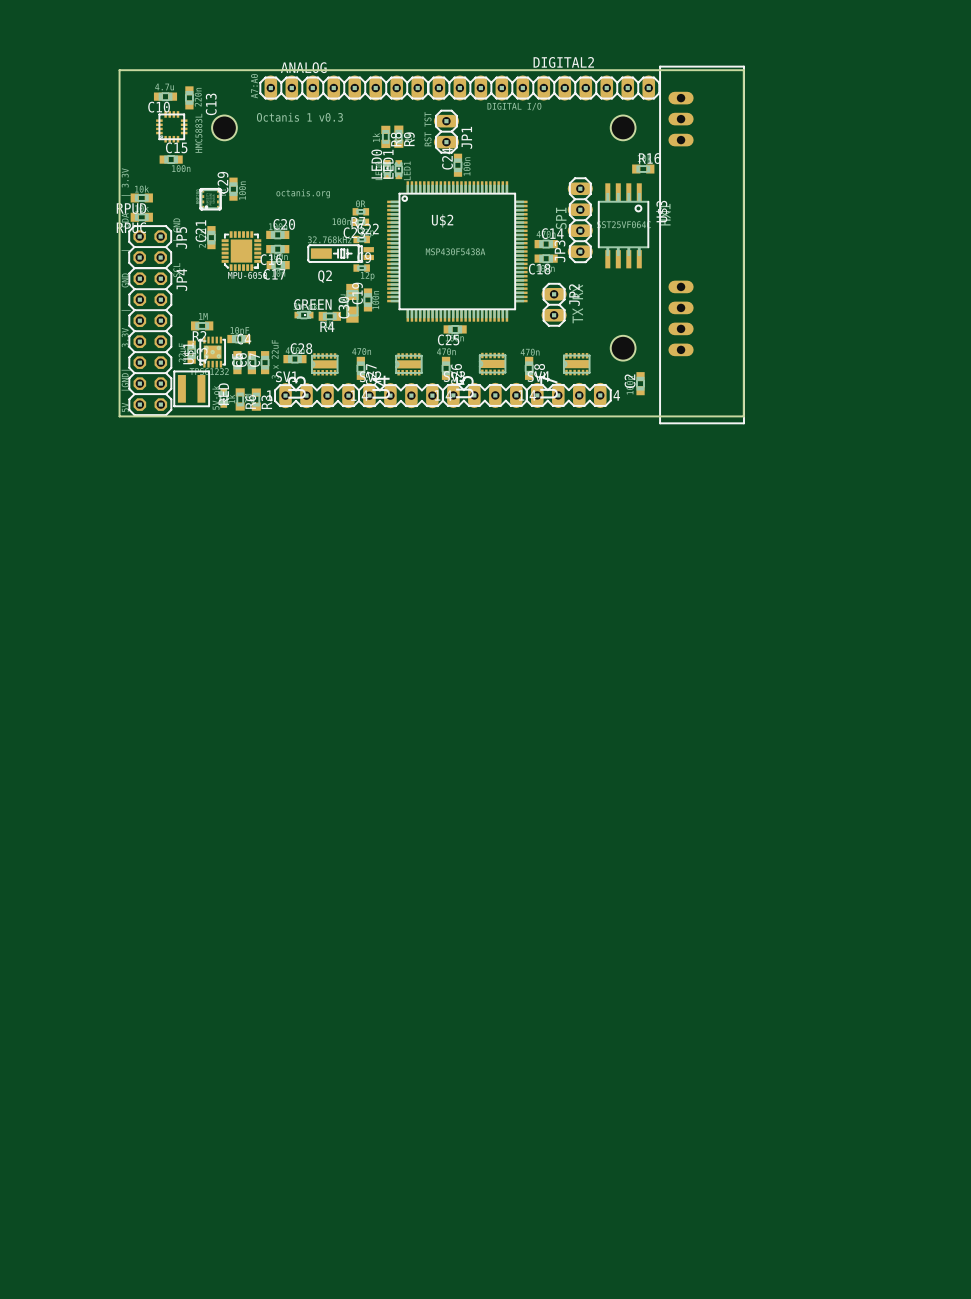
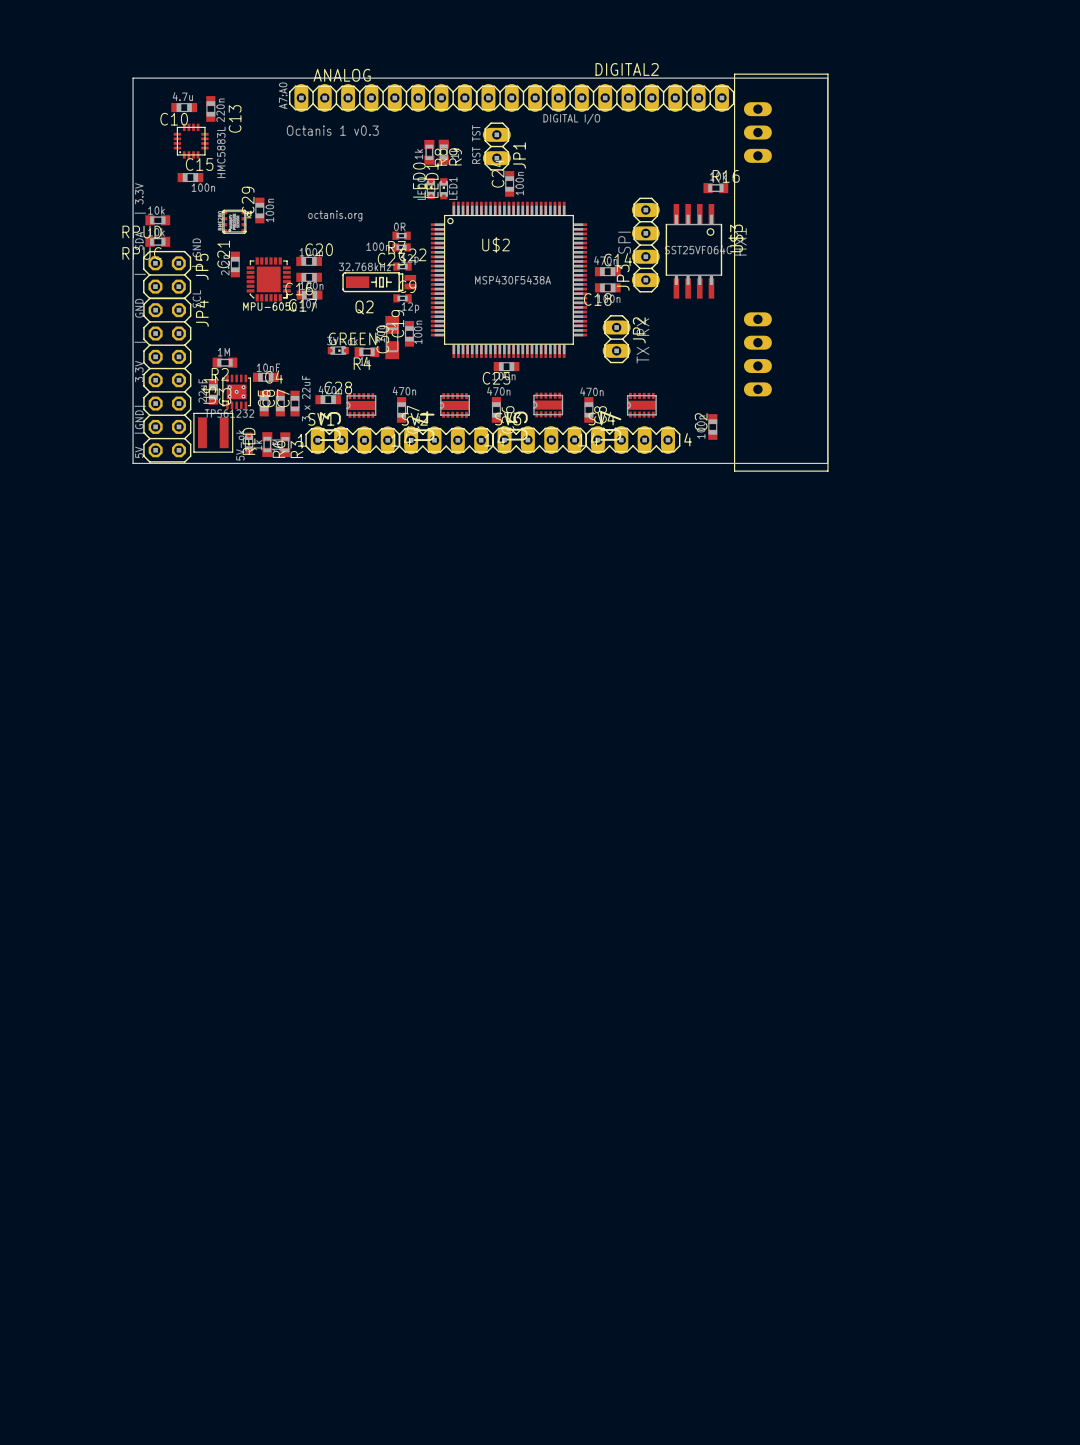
hole: (224, 127) -> none
hole: (623, 127) -> none
hole: (623, 348) -> none

